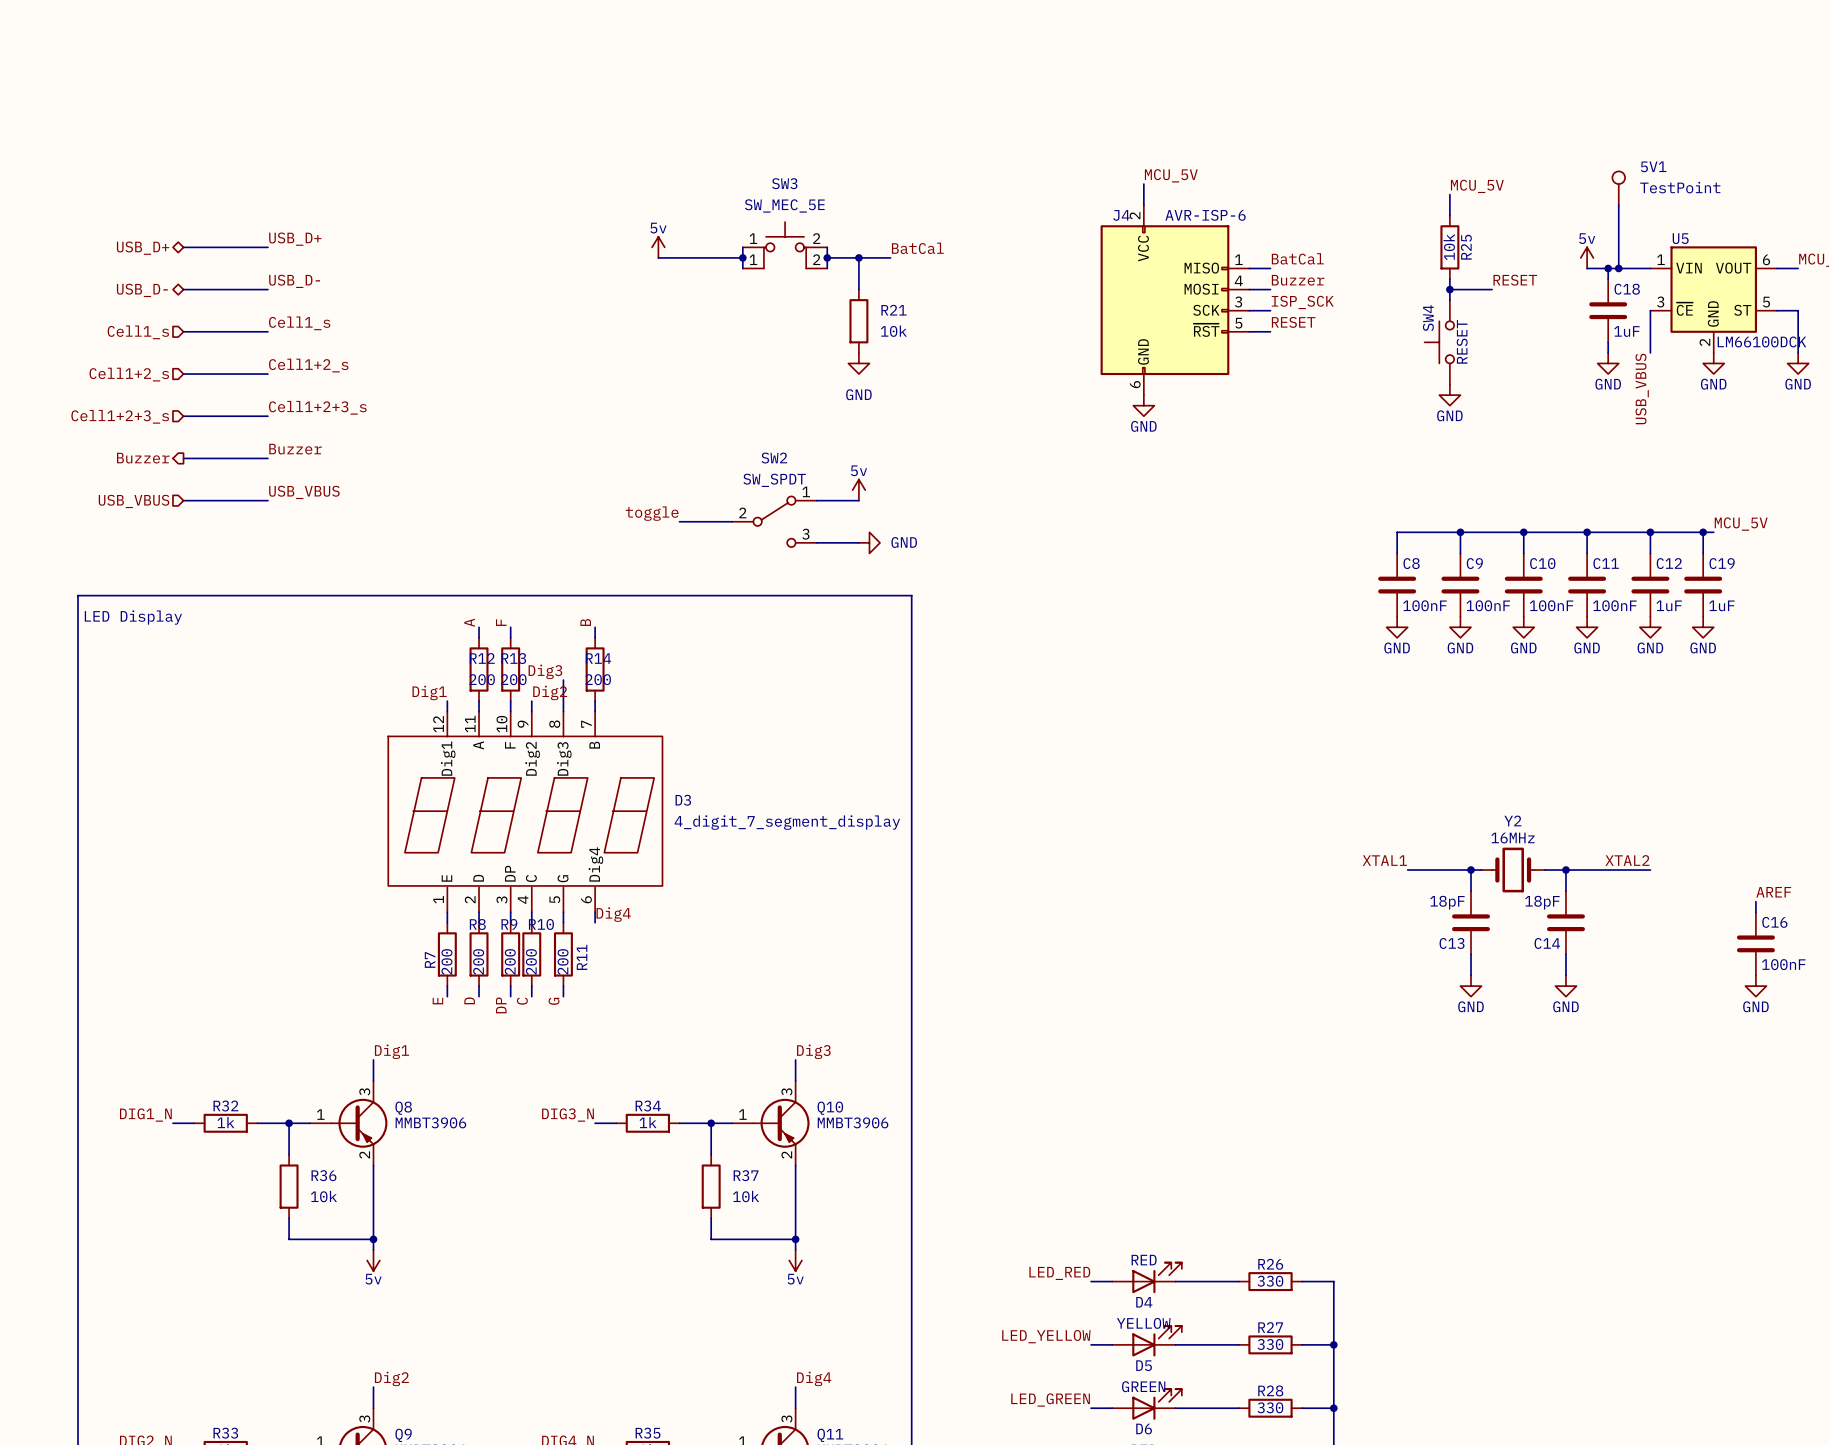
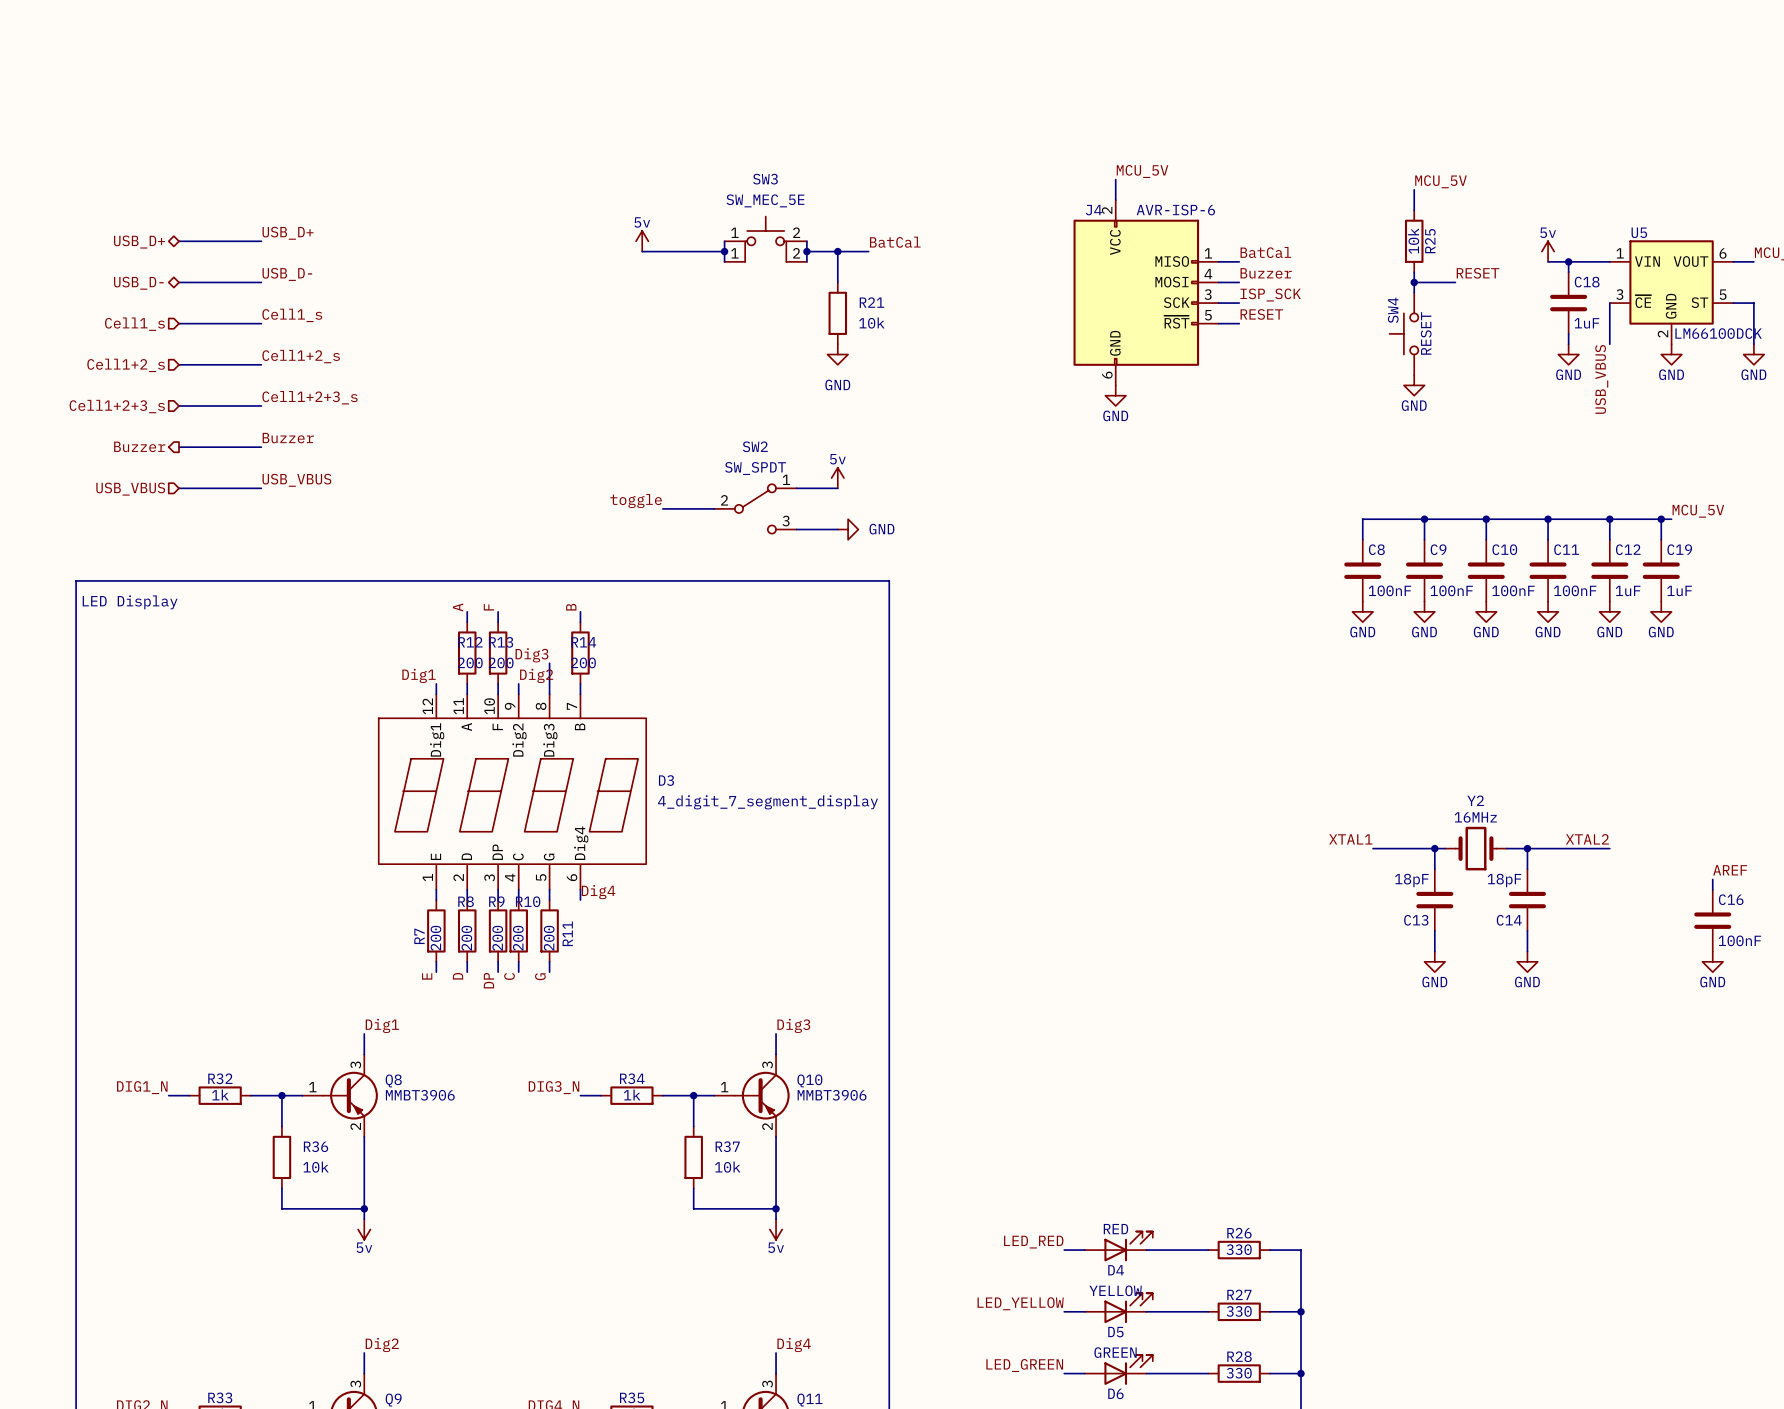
5V1: TestPoint (1618, 188) -> none
wire: (1618, 205) (1618, 268) -> none
junction: (1618, 268) -> none

